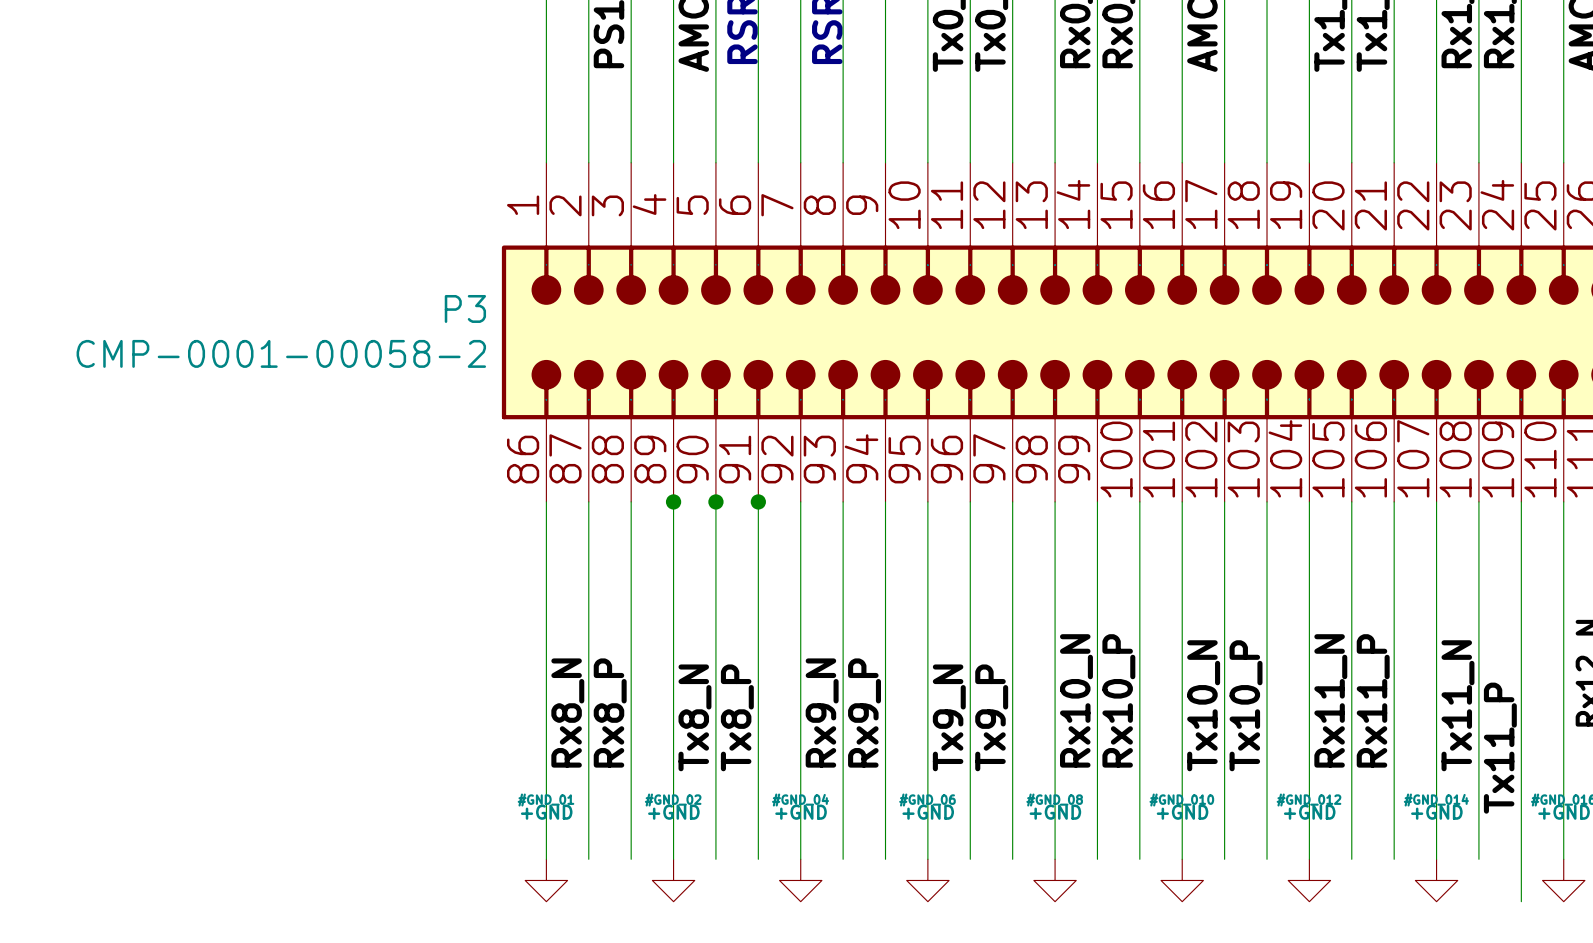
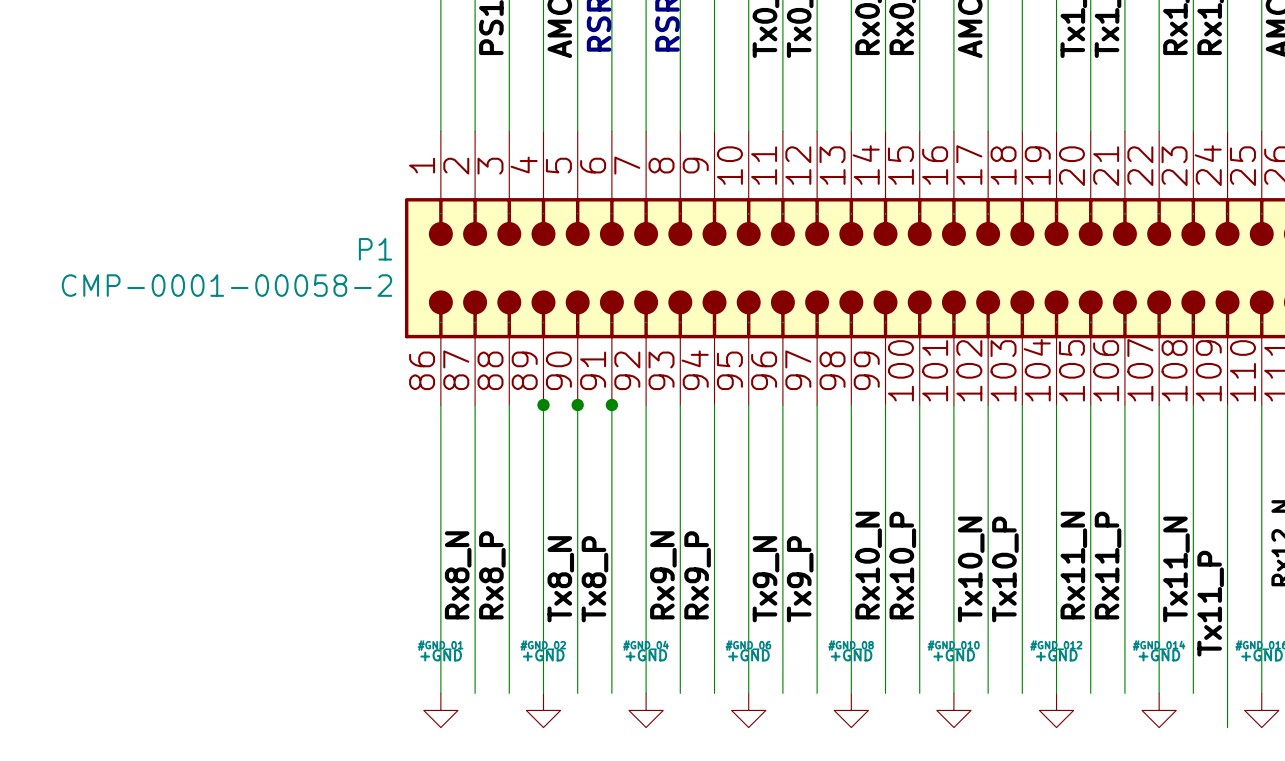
P3 name: P3 (465, 308) -> P1 (375, 249)

